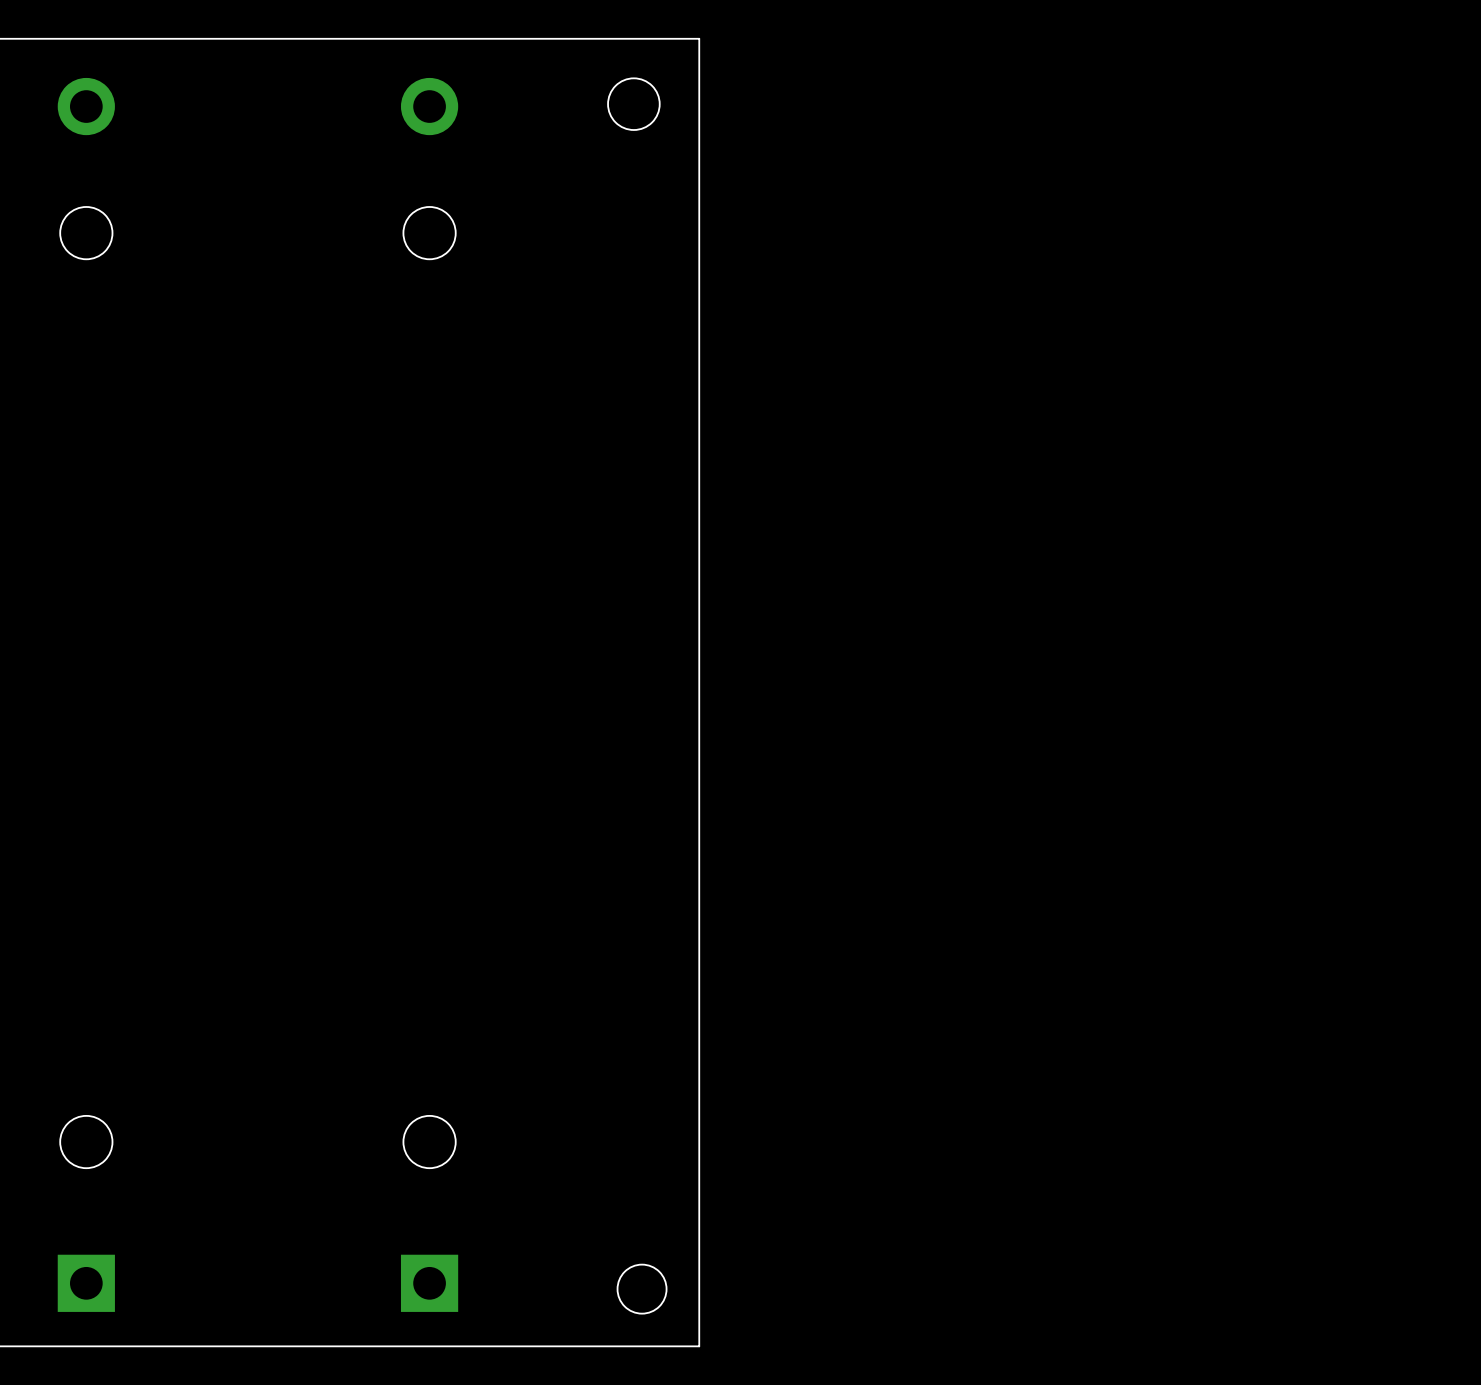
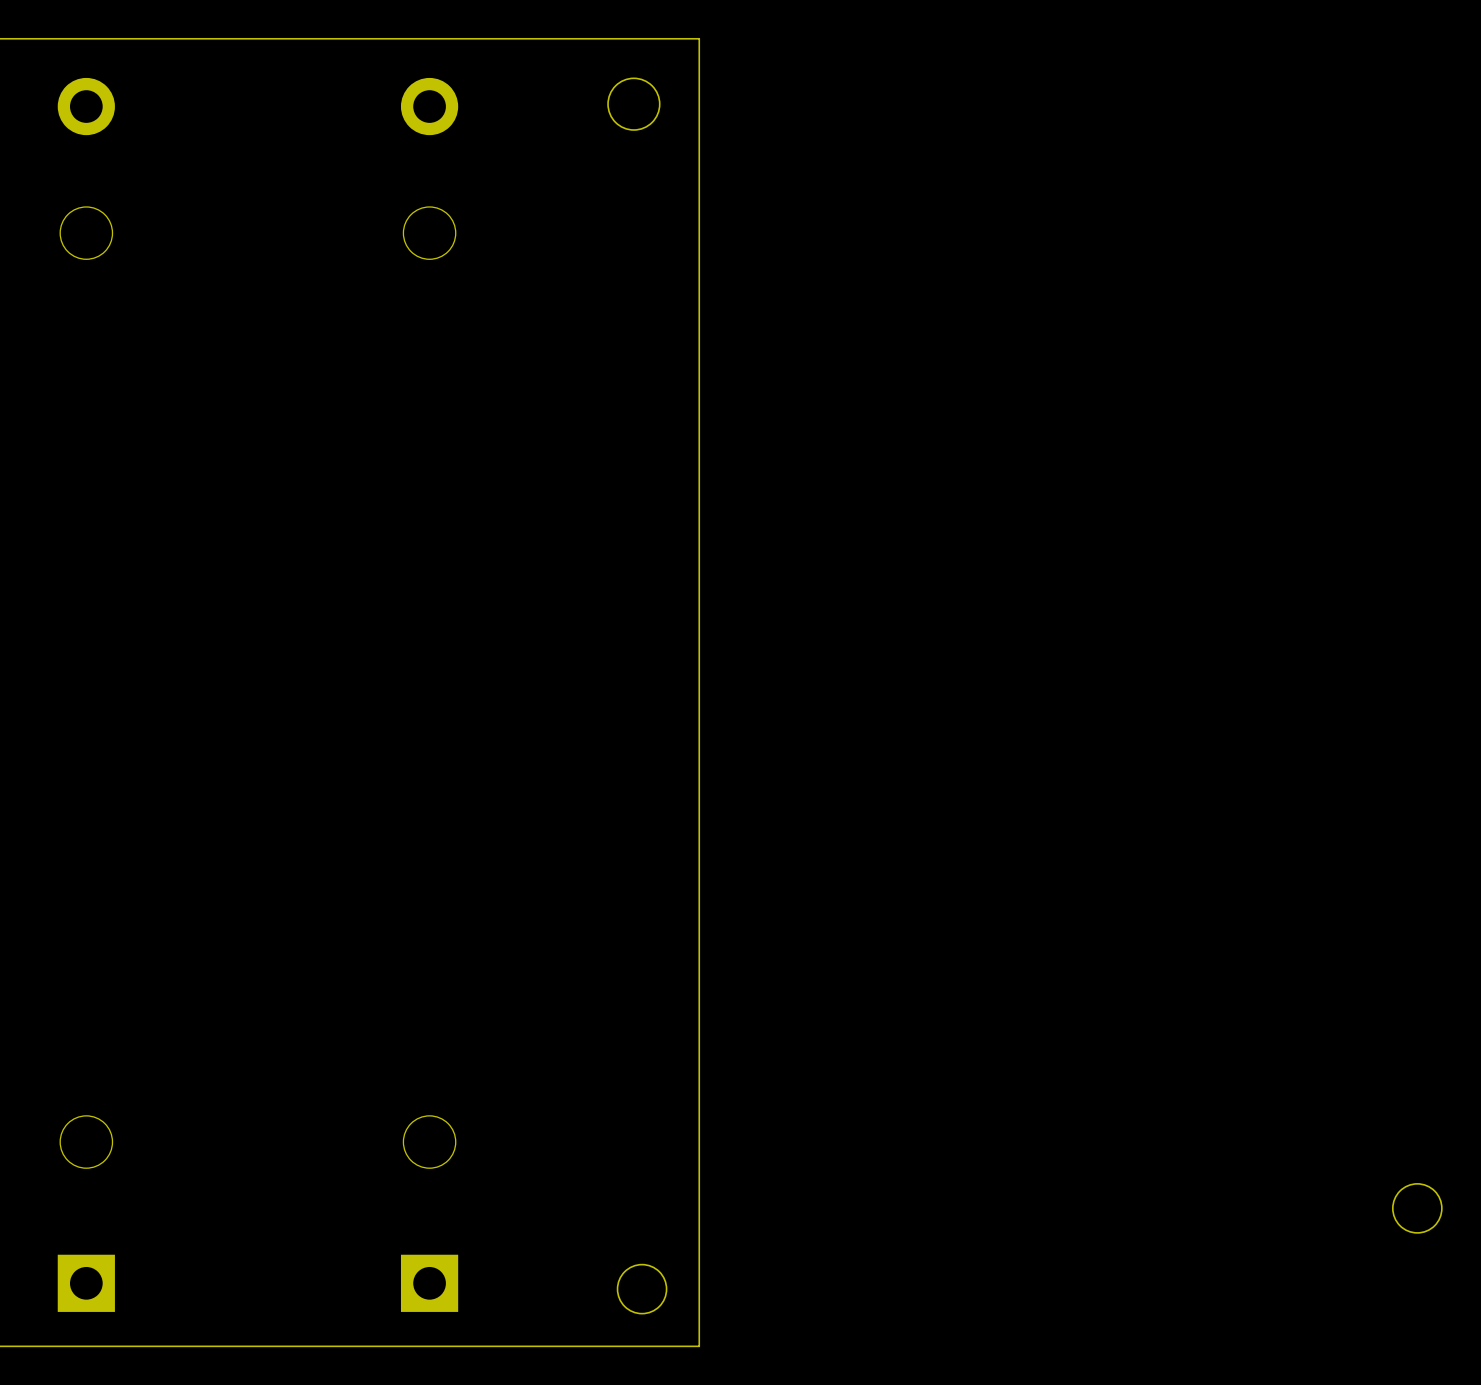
round board edge: none -> [1392, 1183, 1443, 1234]

